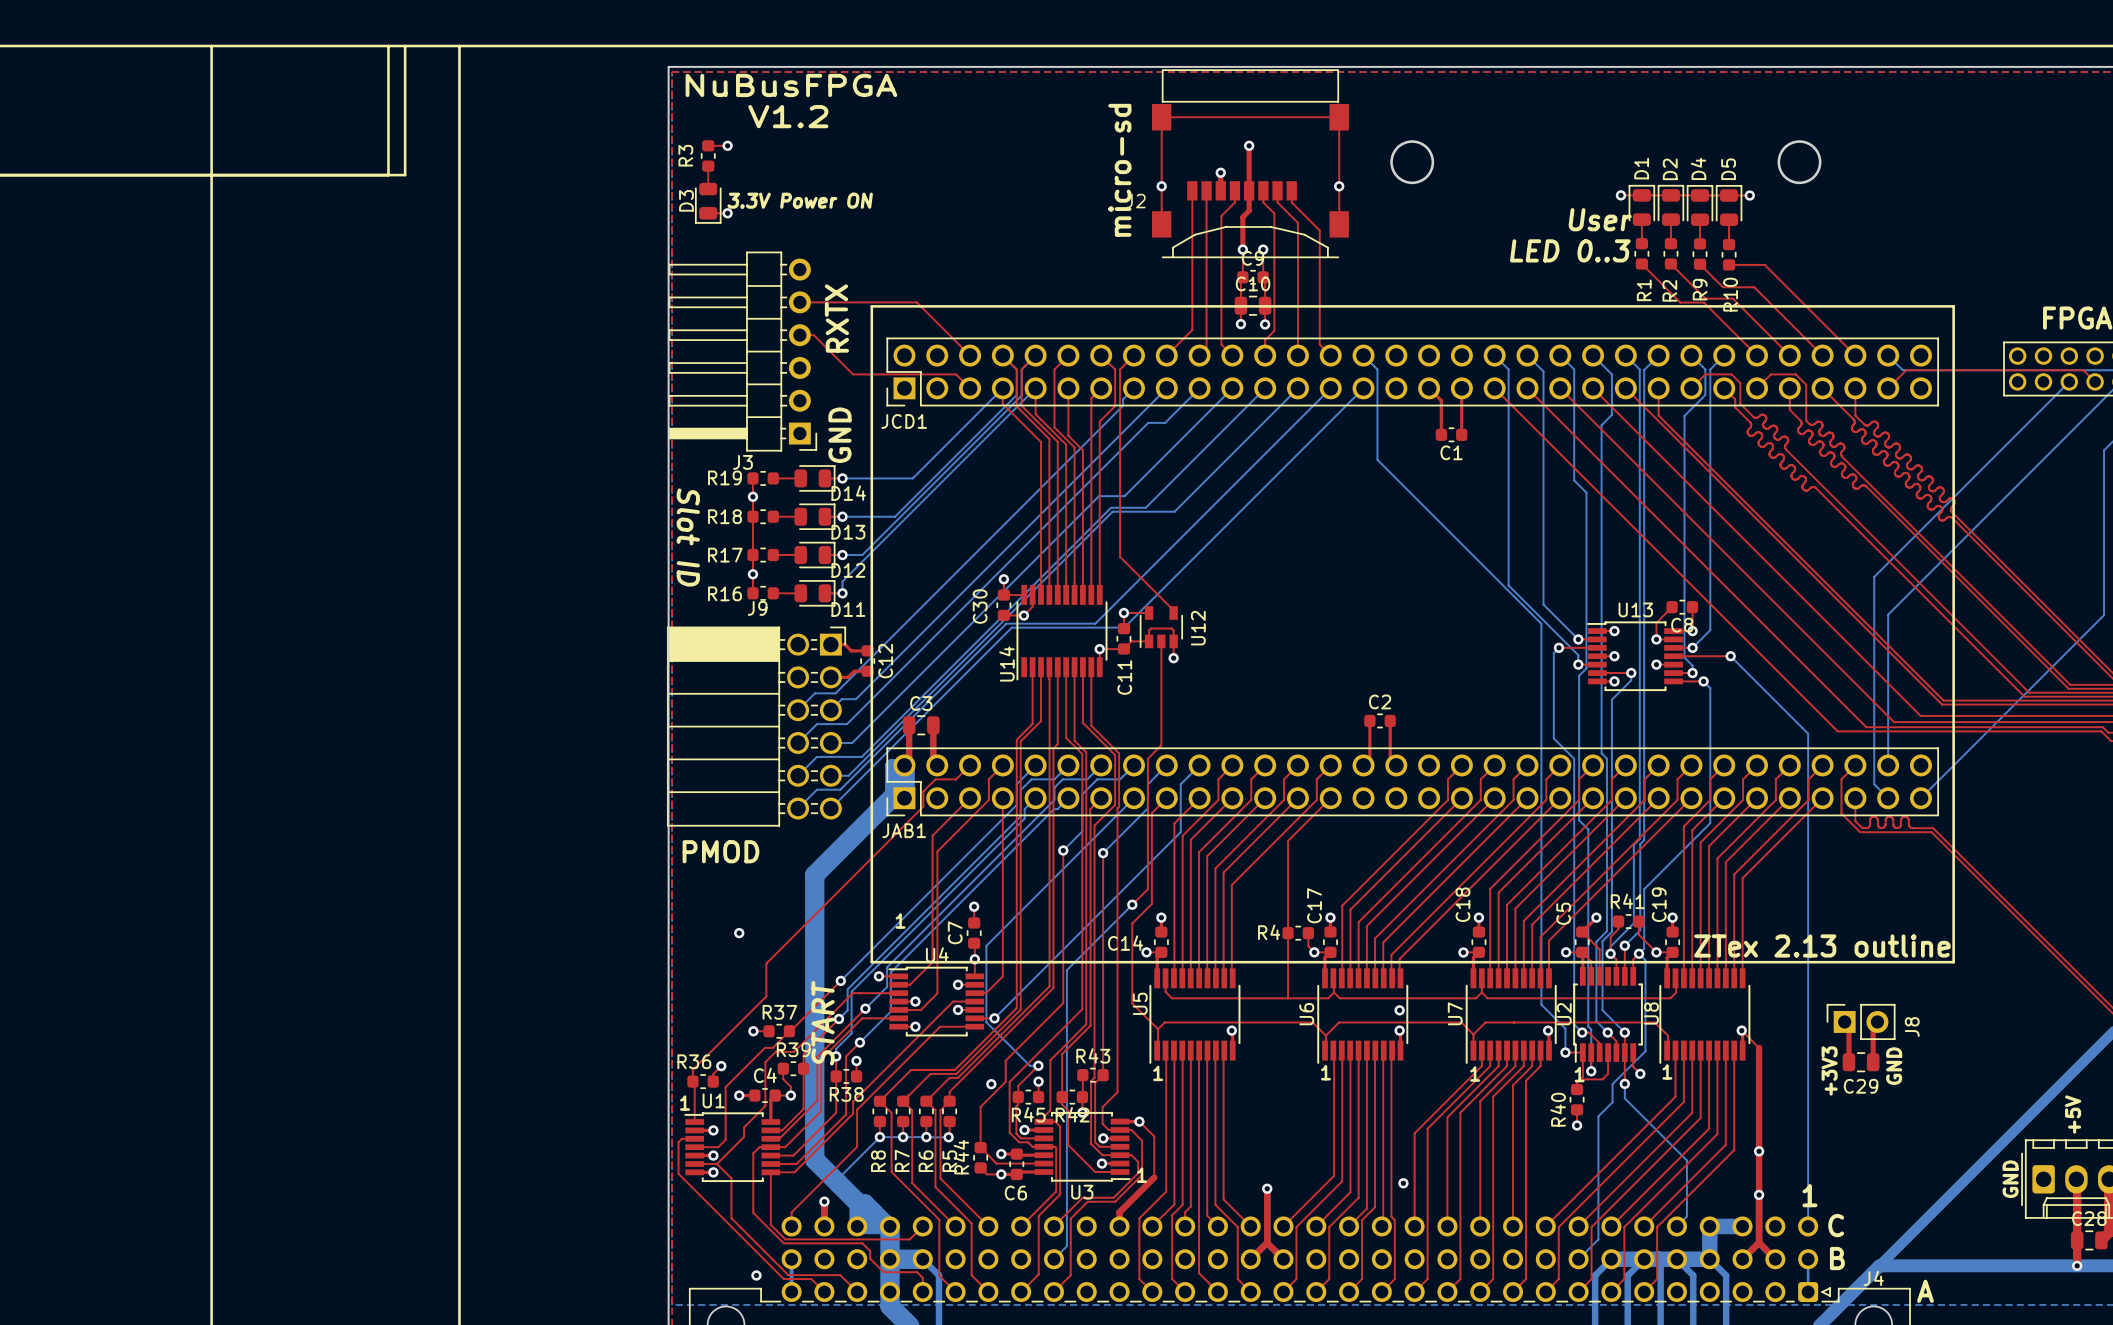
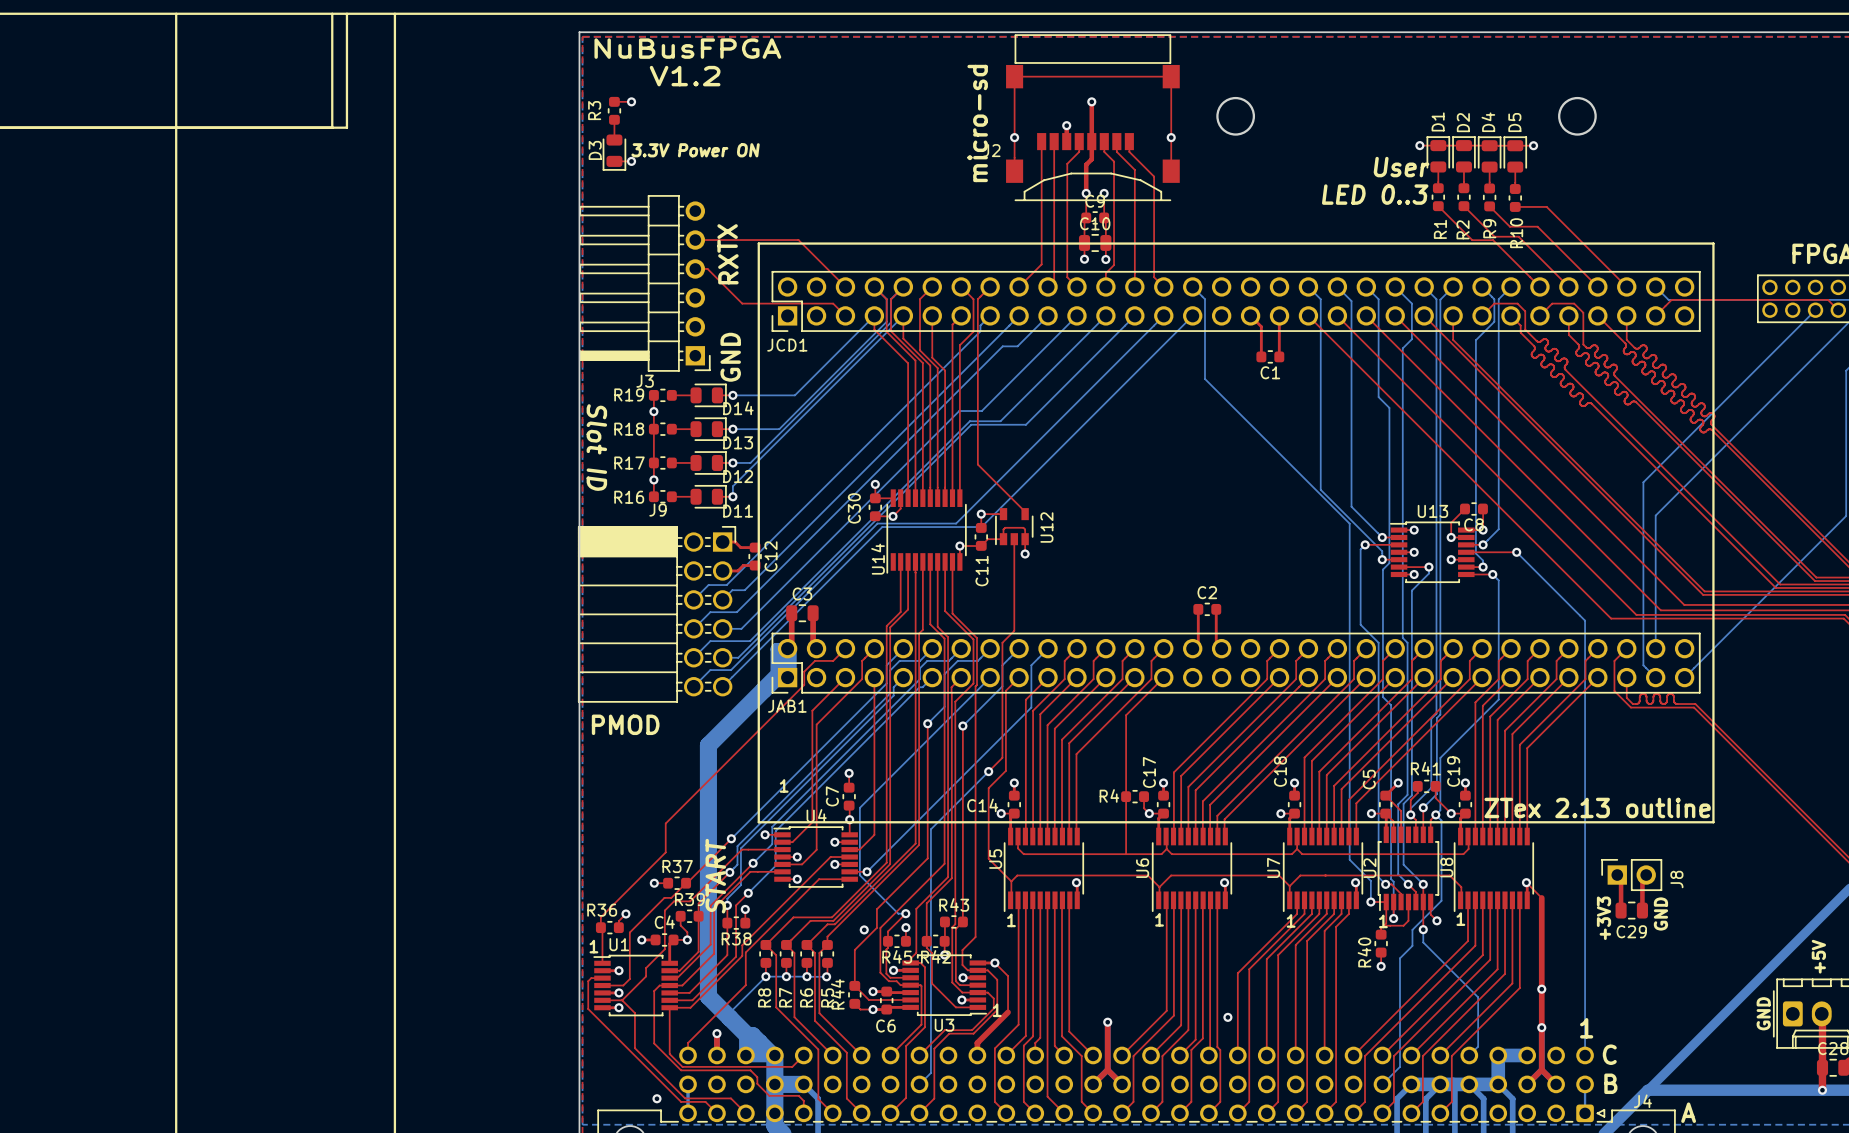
via: (739, 933) -> none
via: (1399, 1010) -> none

